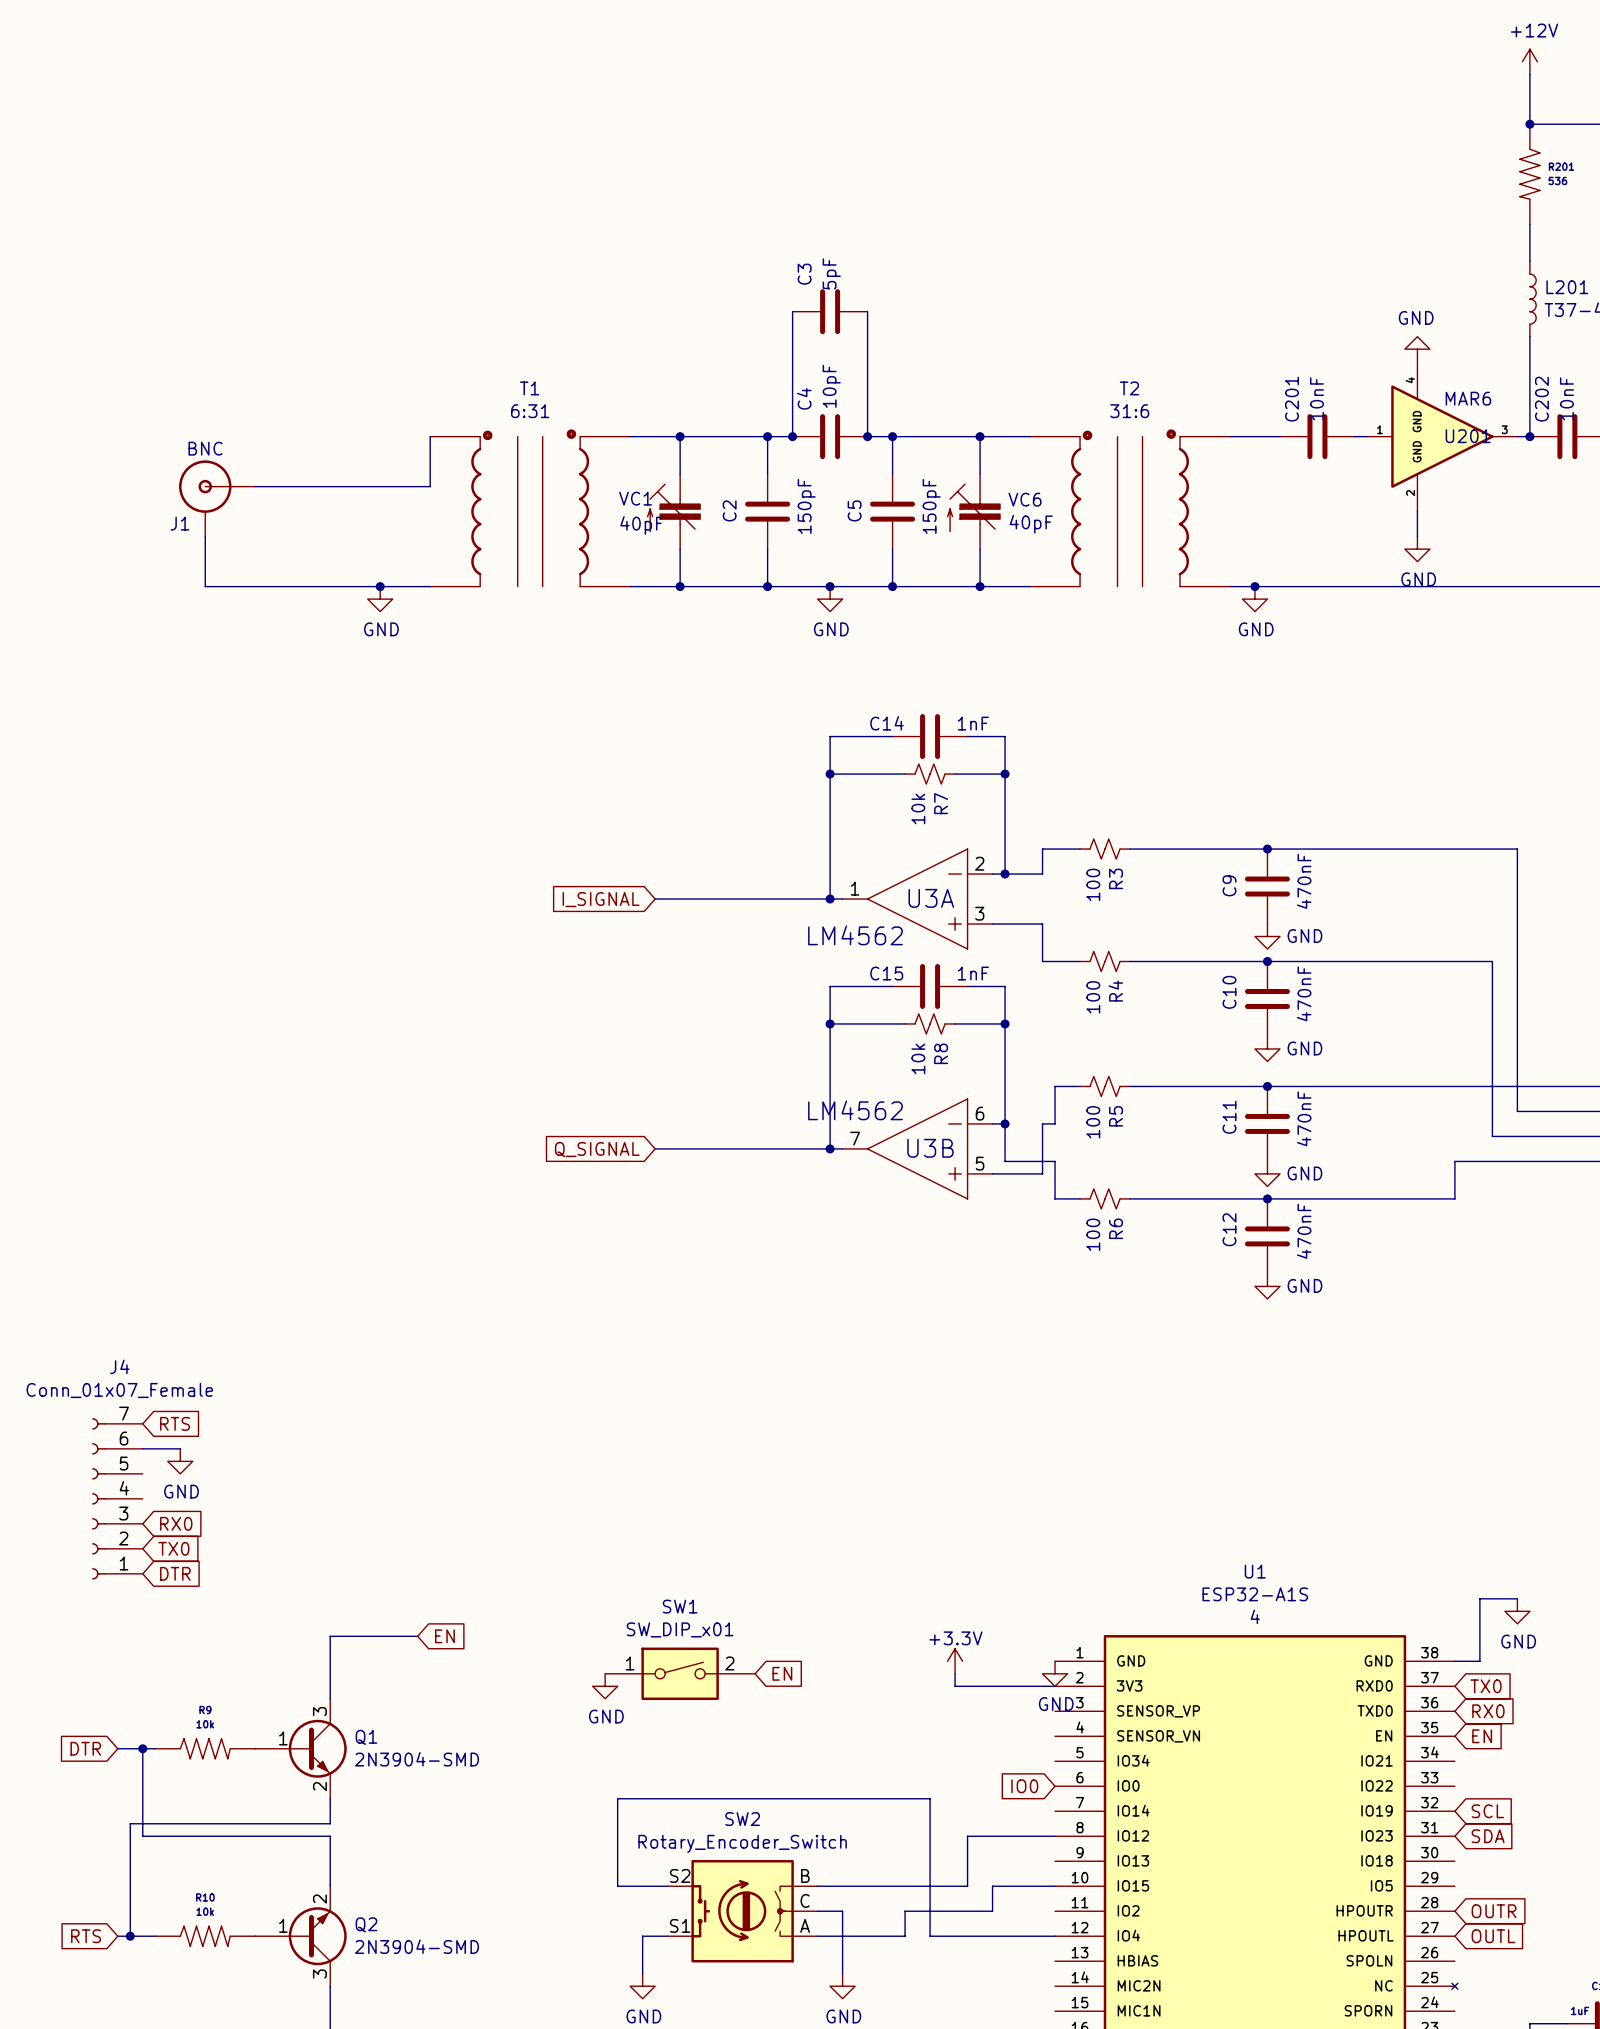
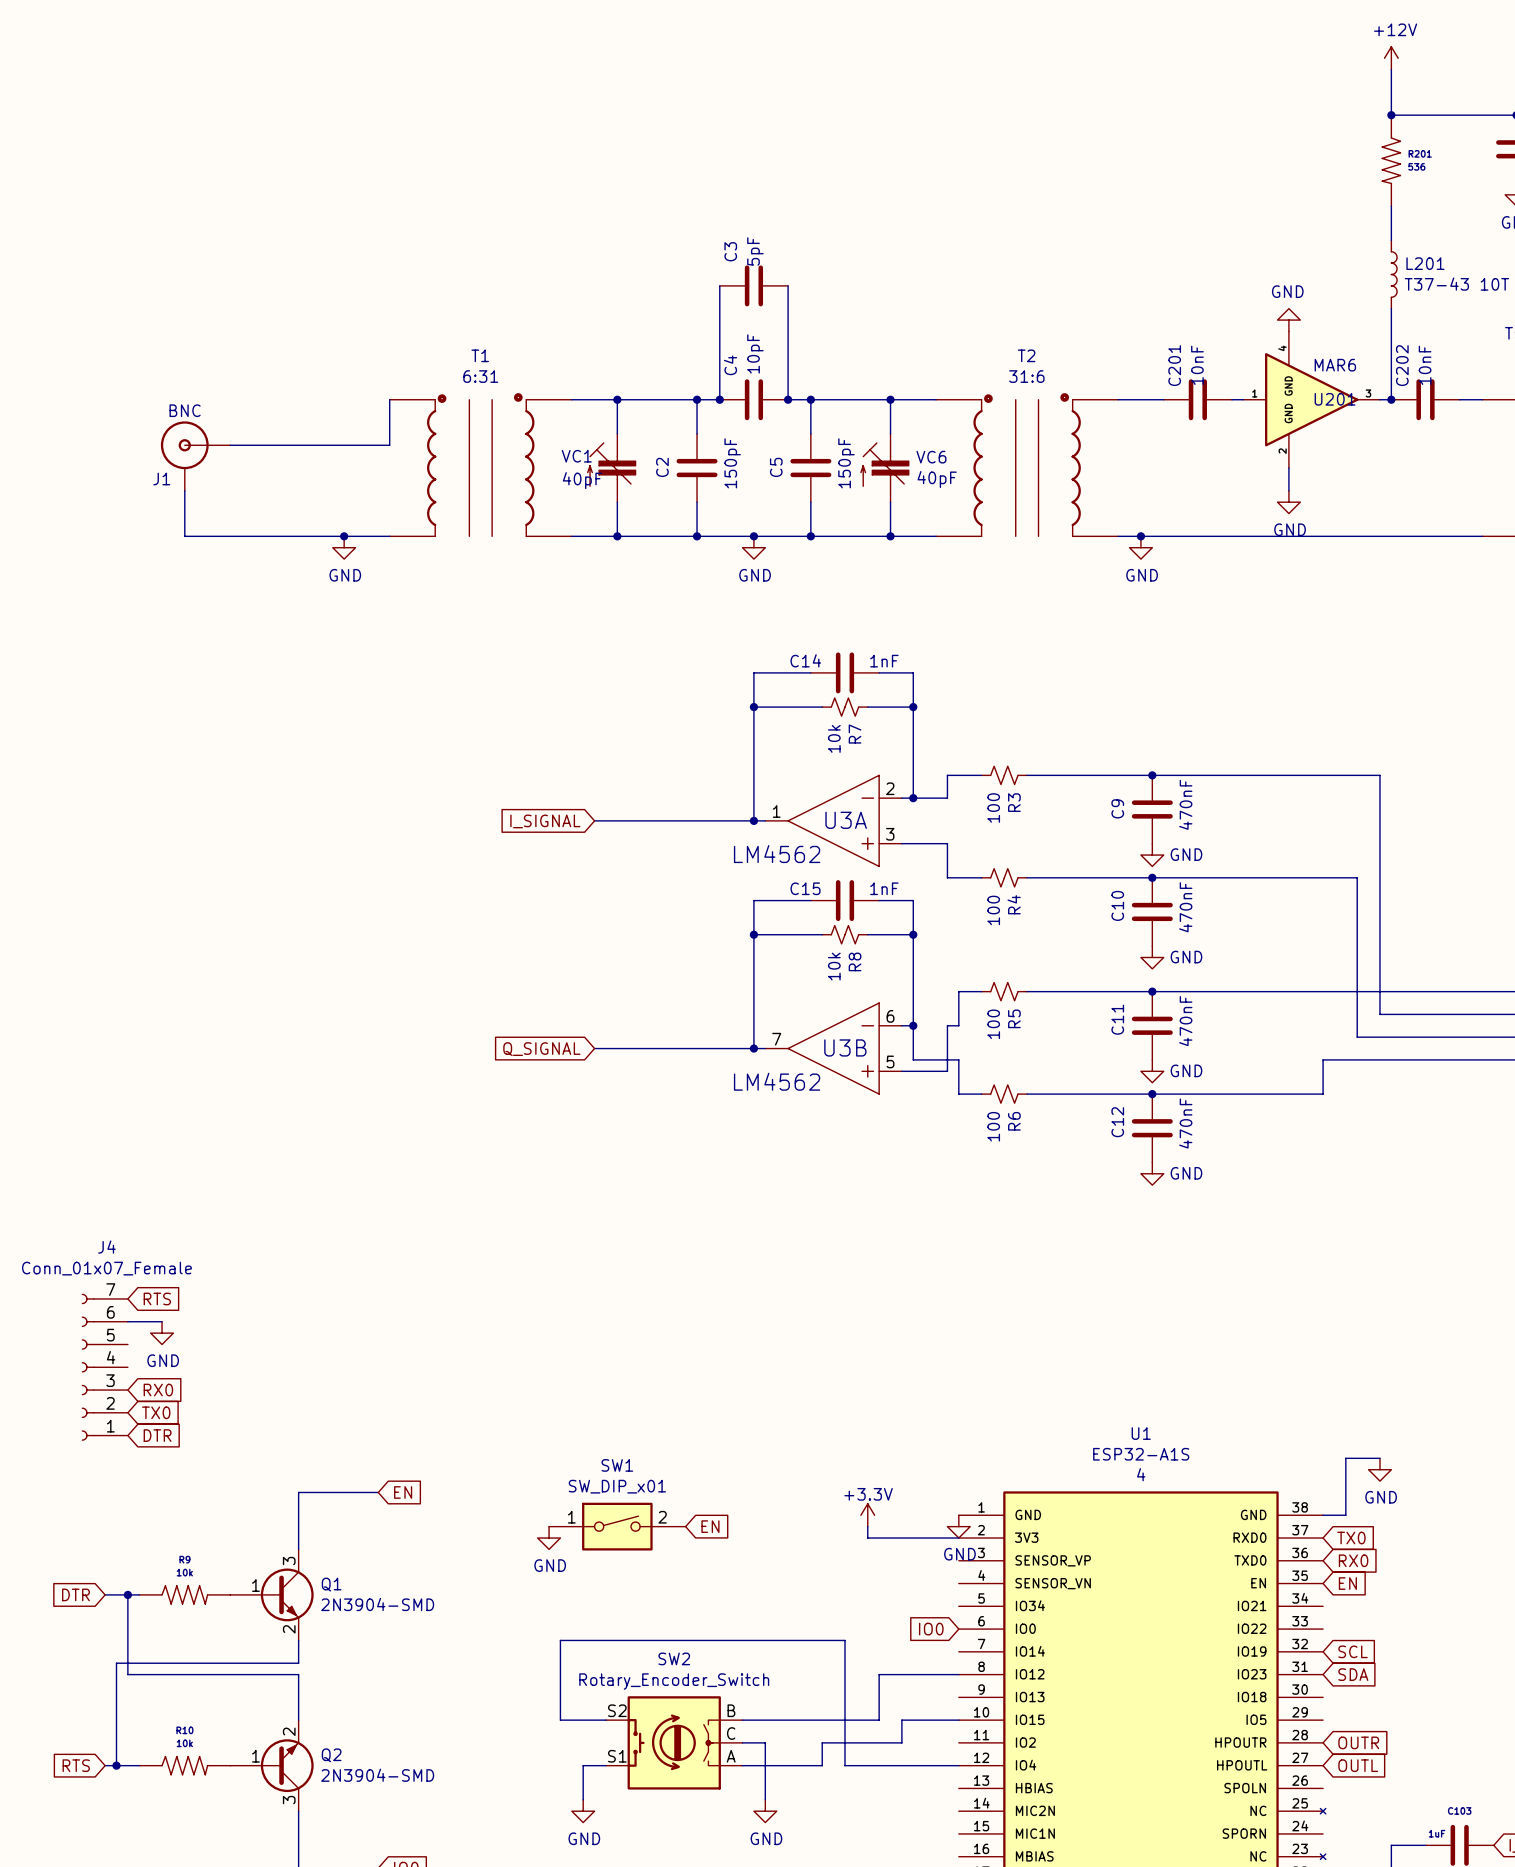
U3B value position: LM4562 (855, 1110) -> LM4562 (777, 1081)

